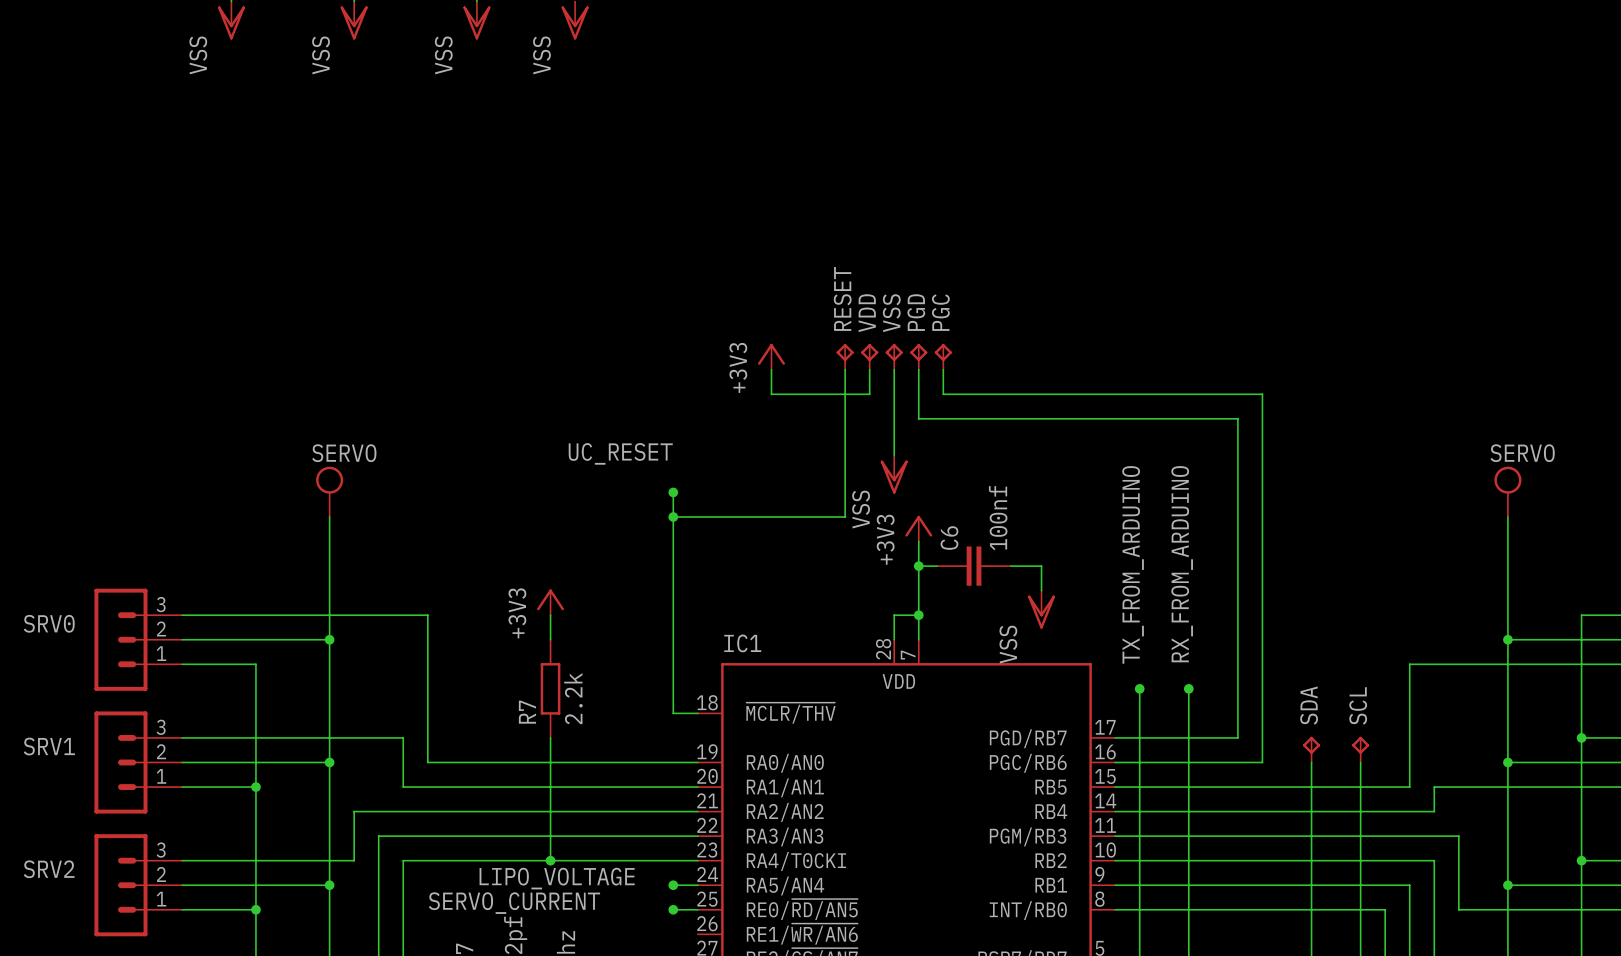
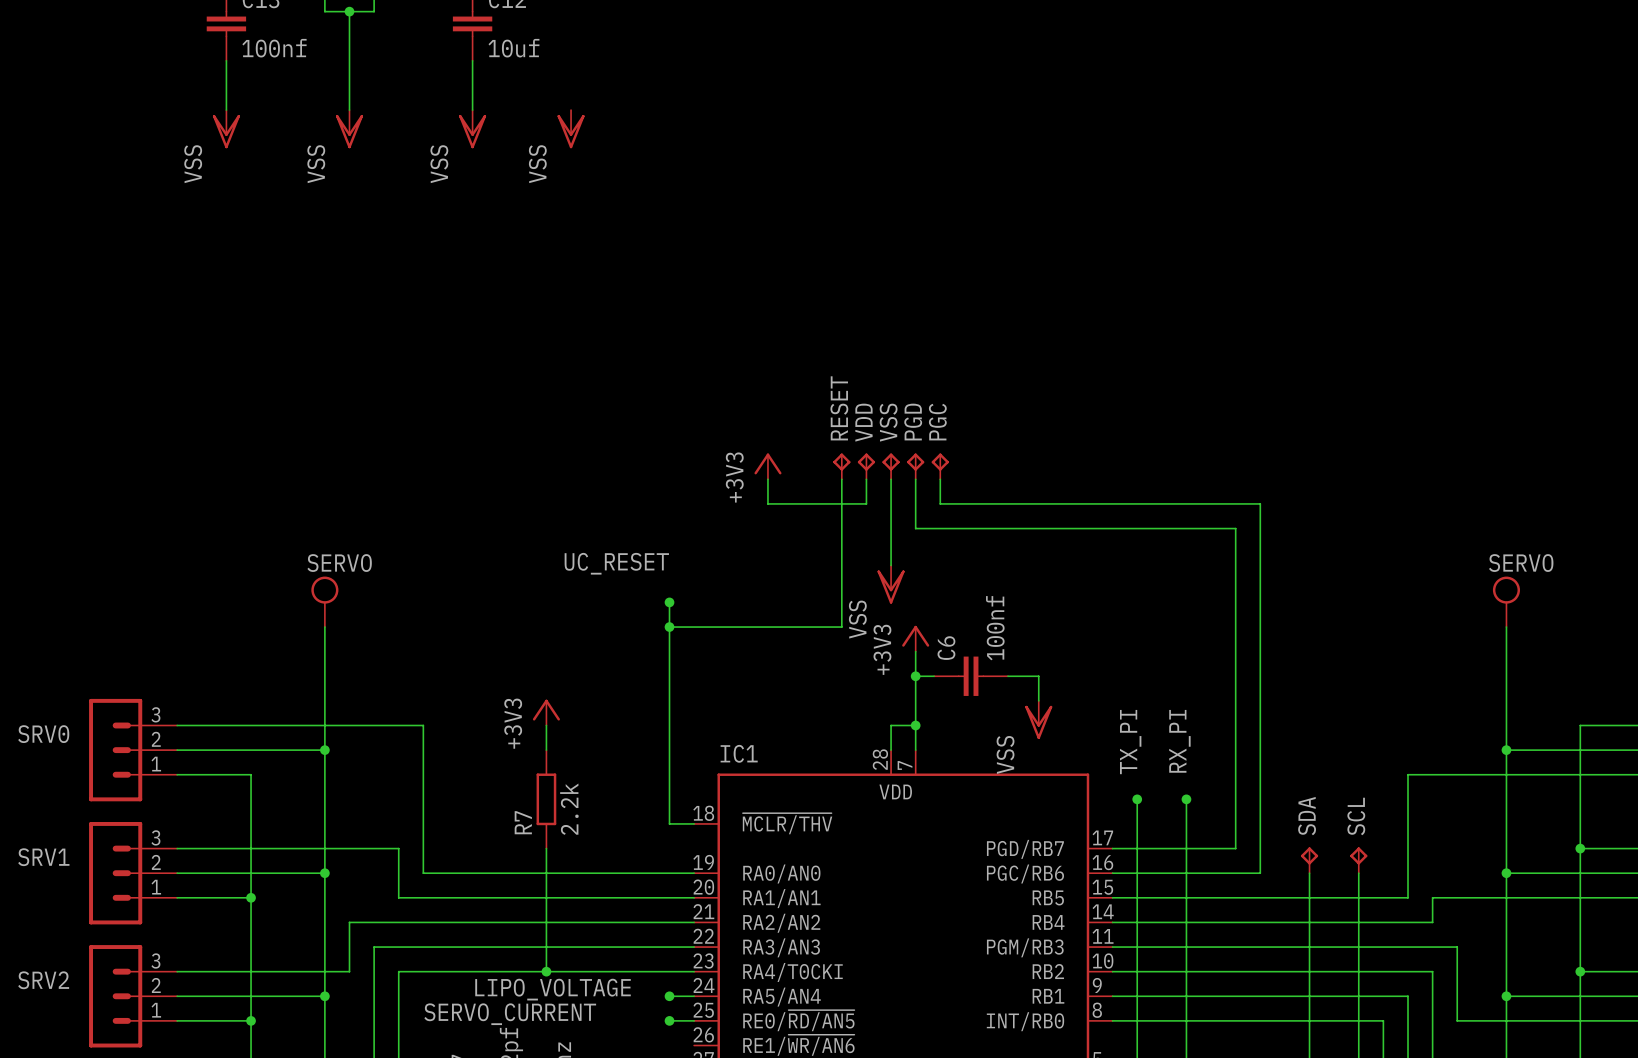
label: TX_FROM_ARDUINO (1133, 564) -> TX_PI (1130, 742)
label: RX_FROM_ARDUINO (1182, 564) -> RX_PI (1179, 741)

